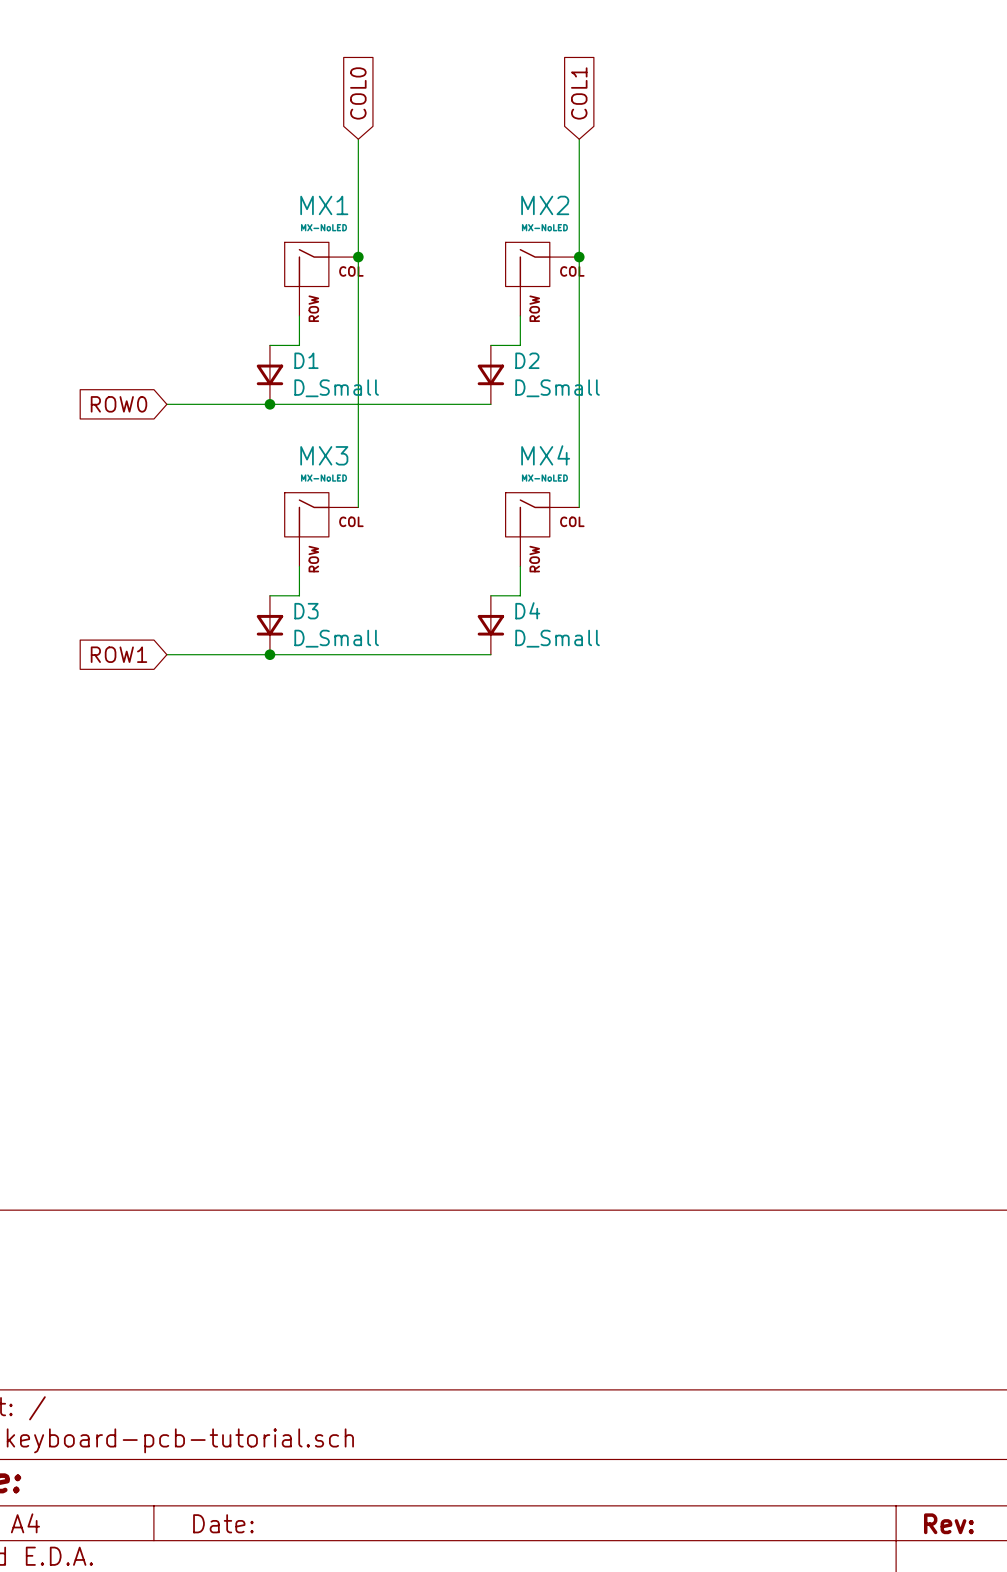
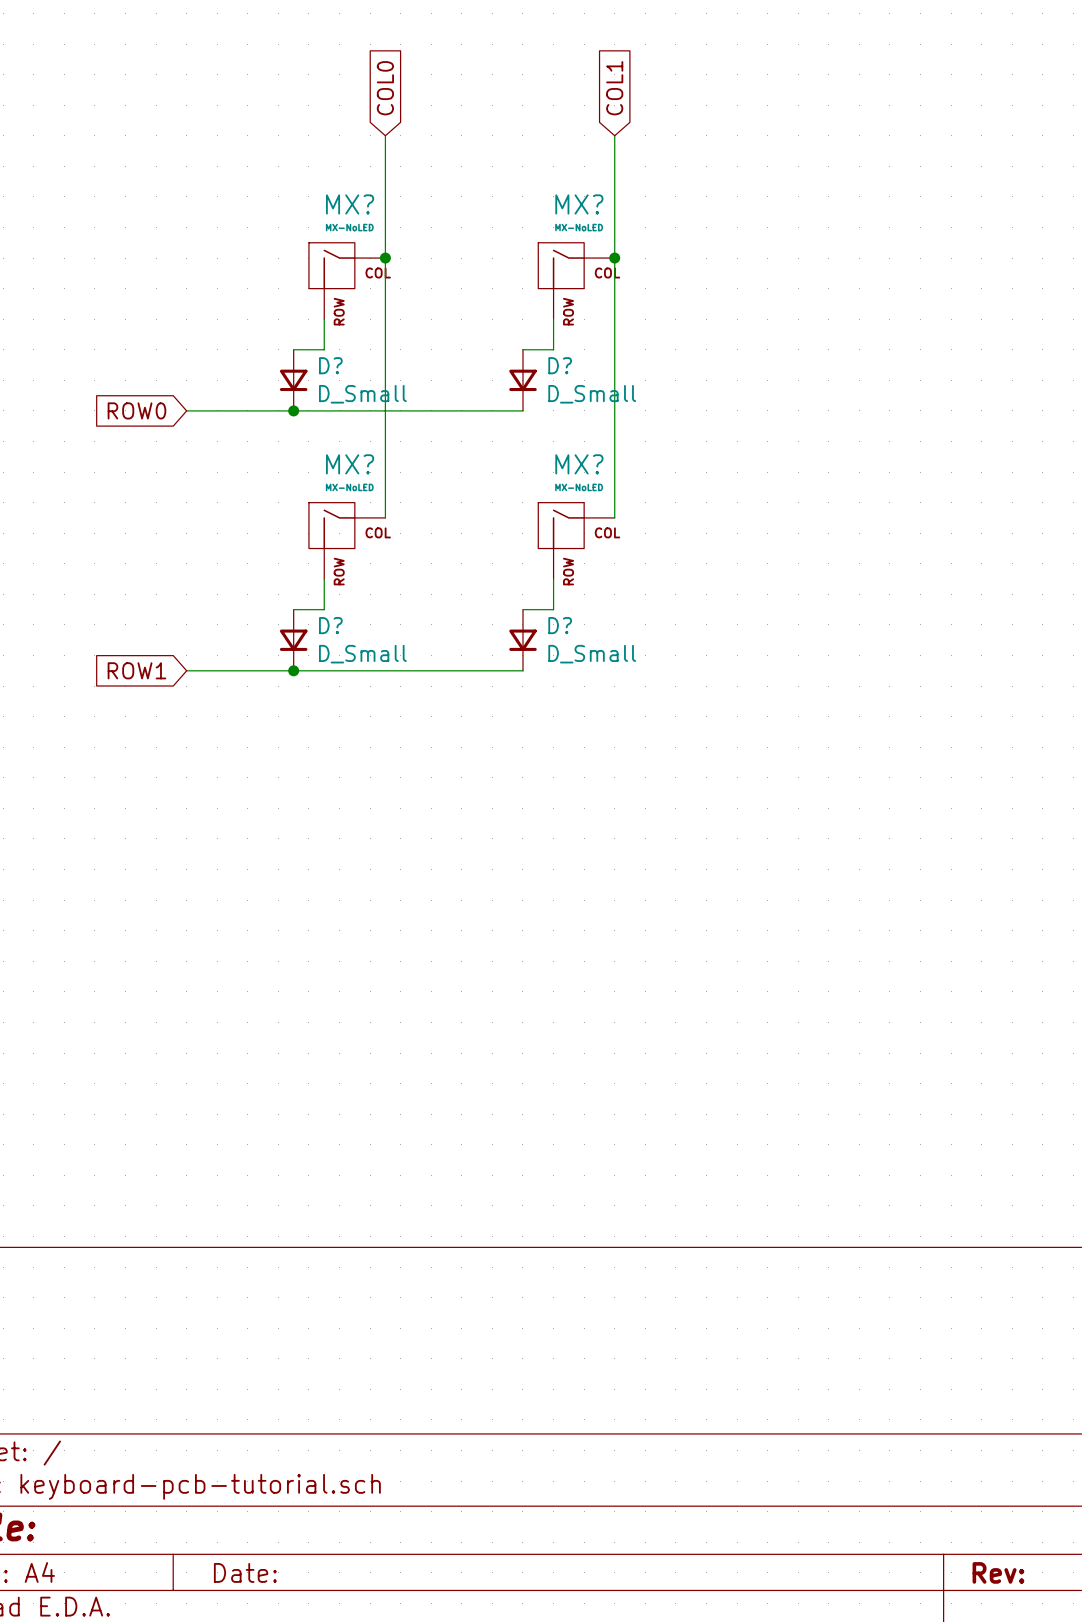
MX1 name: MX1 (324, 205) -> MX? (350, 204)
MX2 name: MX2 (545, 205) -> MX? (579, 204)
D1 name: D1 (306, 360) -> D? (330, 365)
D2 name: D2 (527, 360) -> D? (560, 365)
MX3 name: MX3 (324, 455) -> MX? (350, 464)
MX4 name: MX4 (545, 455) -> MX? (579, 464)
D4 name: D4 (527, 610) -> D? (560, 625)
D3 name: D3 (306, 611) -> D? (330, 625)

